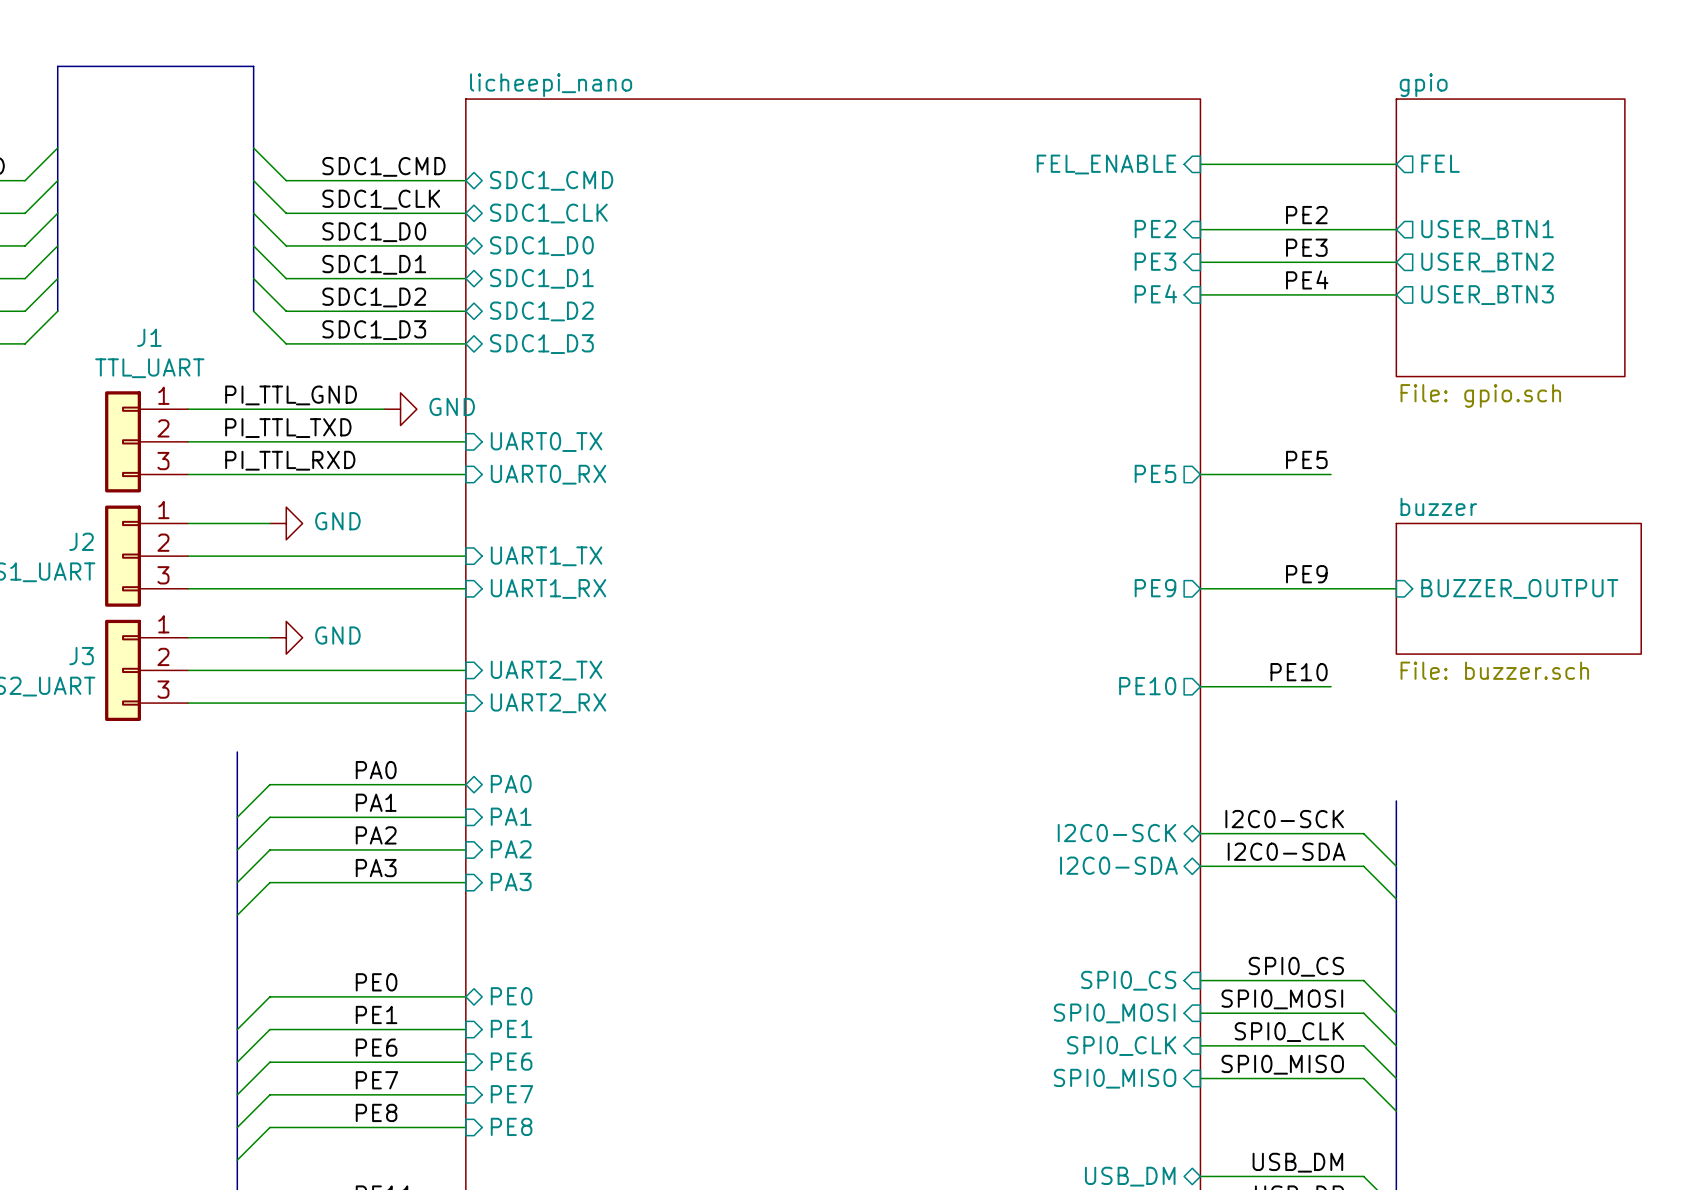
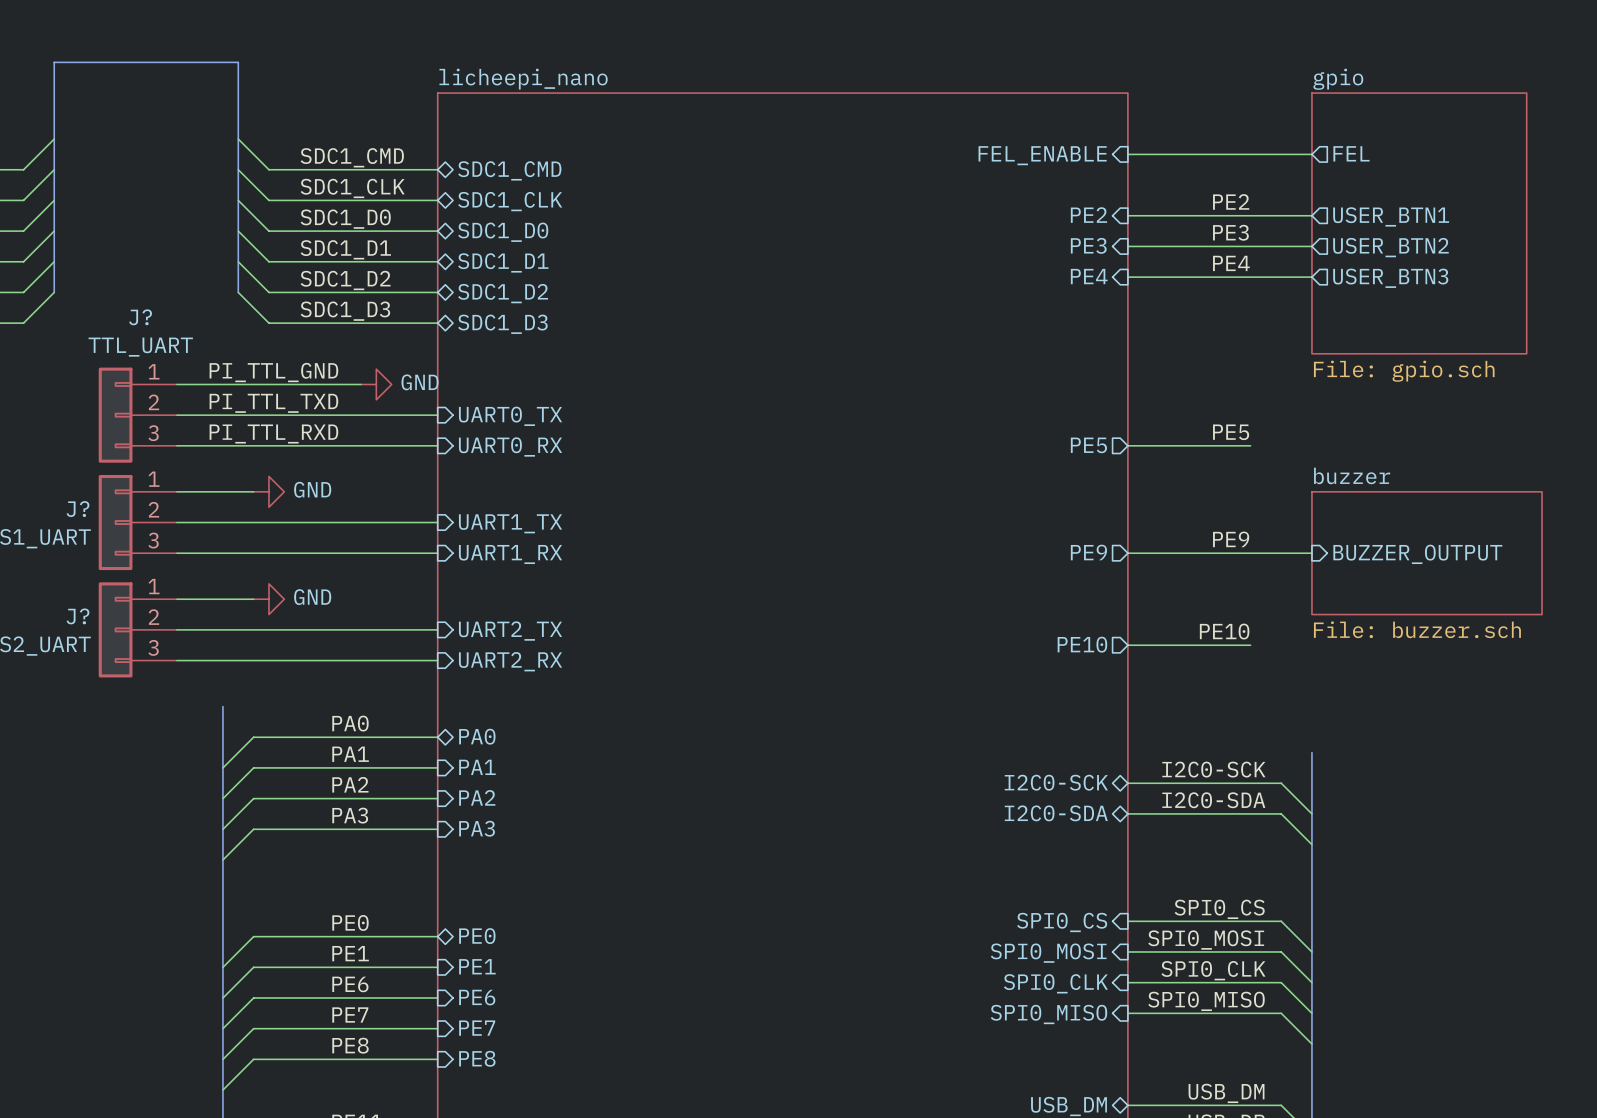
J1 name: J1 (149, 337) -> J? (140, 317)
J2 name: J2 (81, 541) -> J? (78, 509)
J3 name: J3 (81, 656) -> J? (78, 616)

